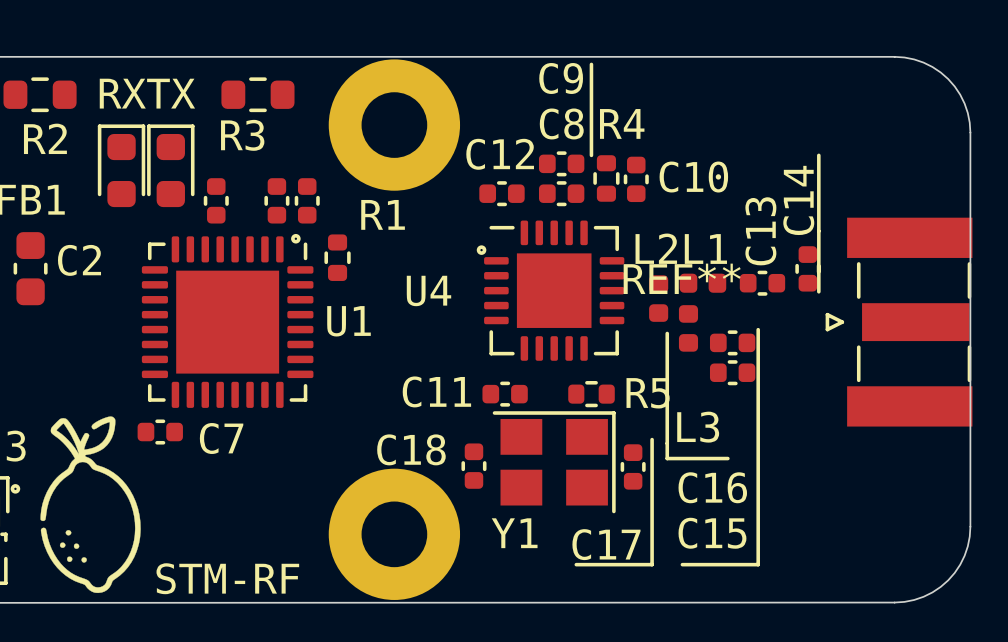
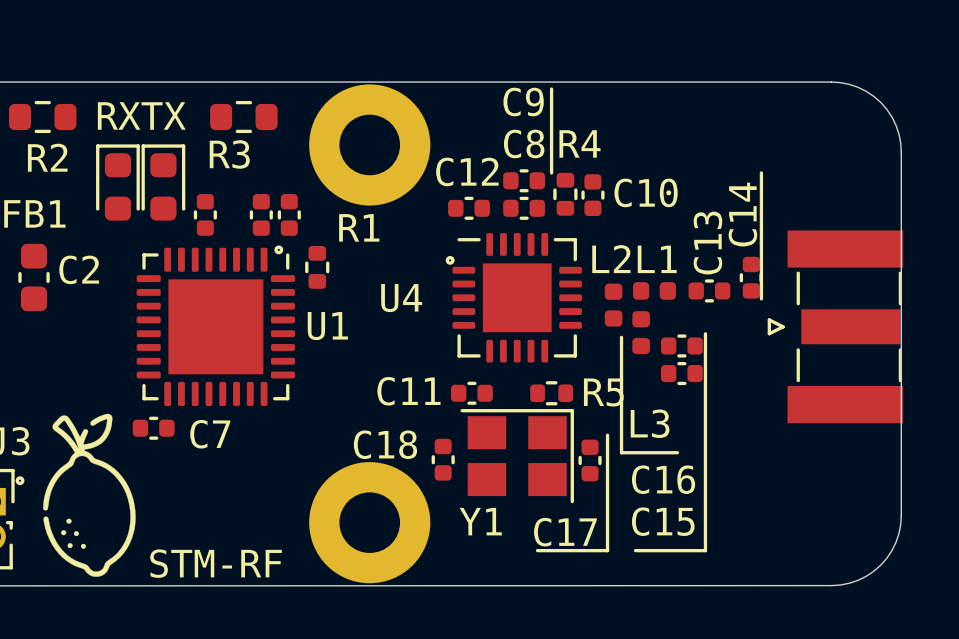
REF**: (682, 278) -> none

